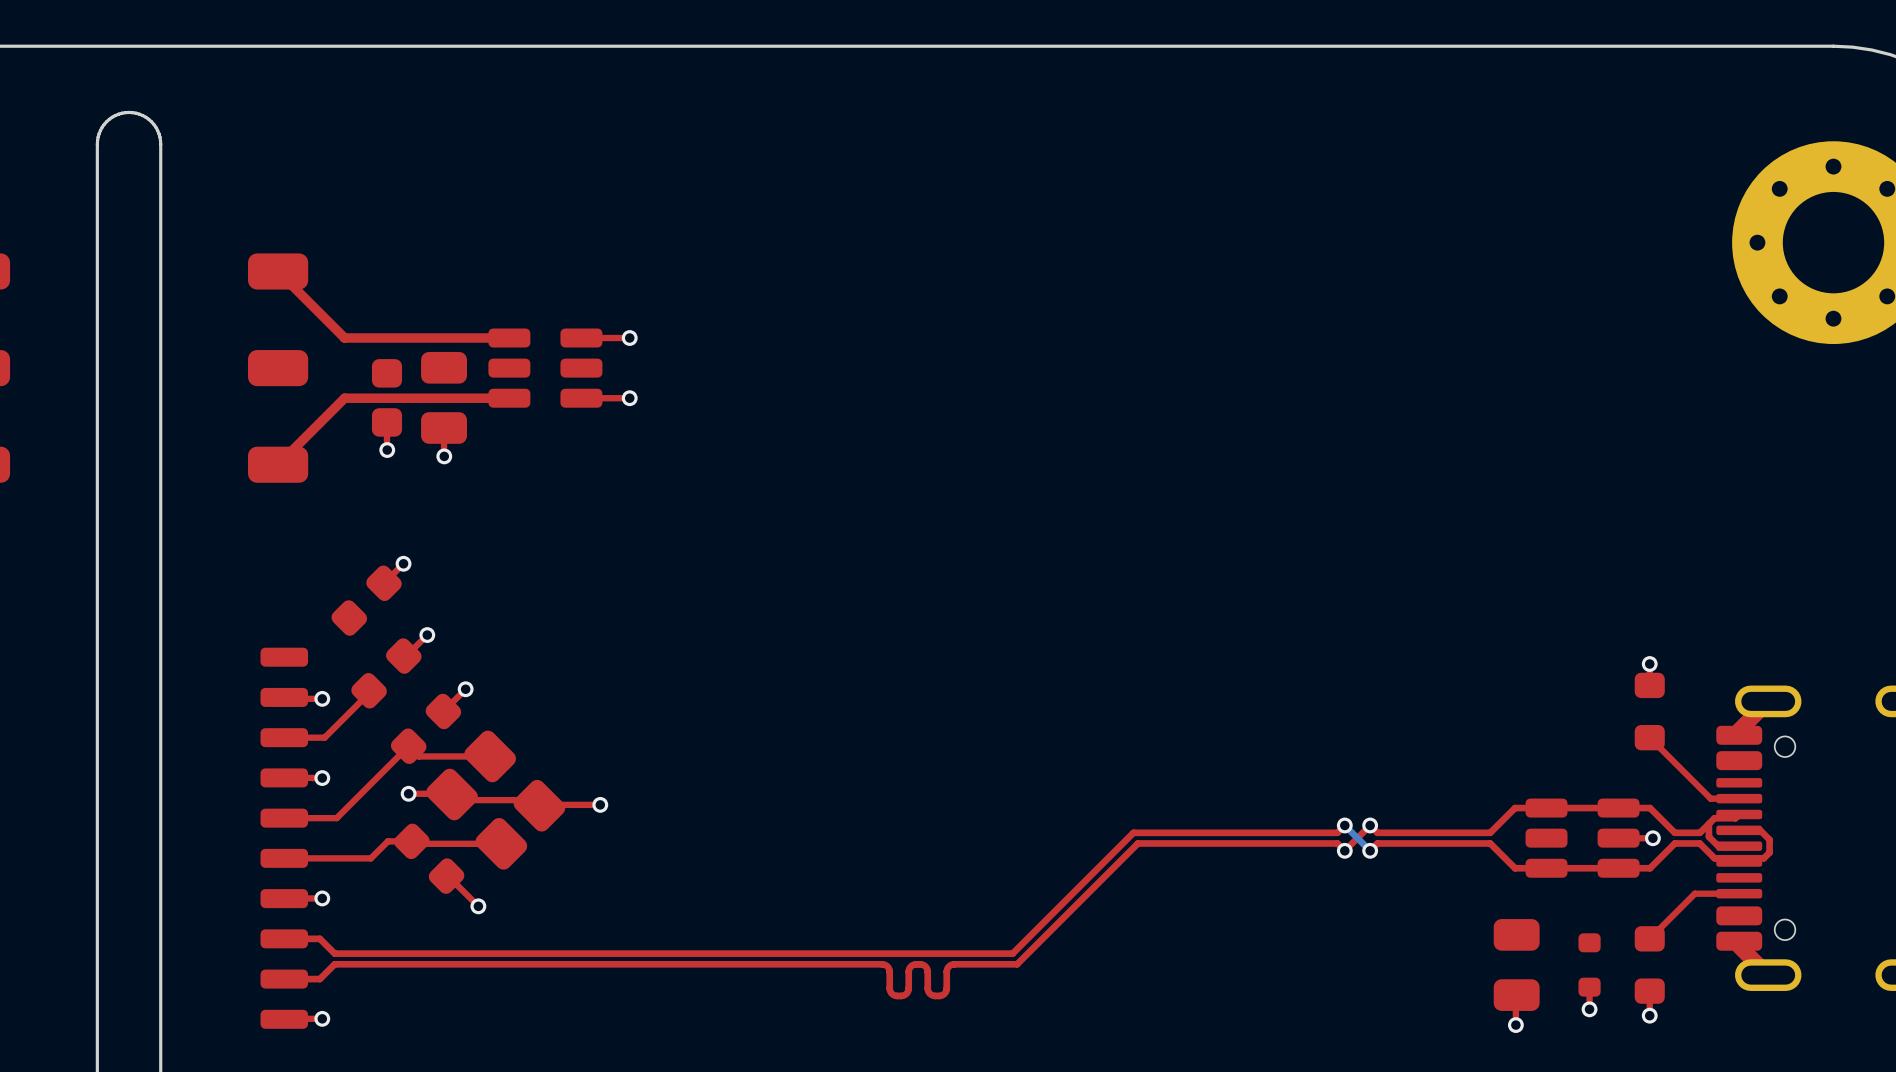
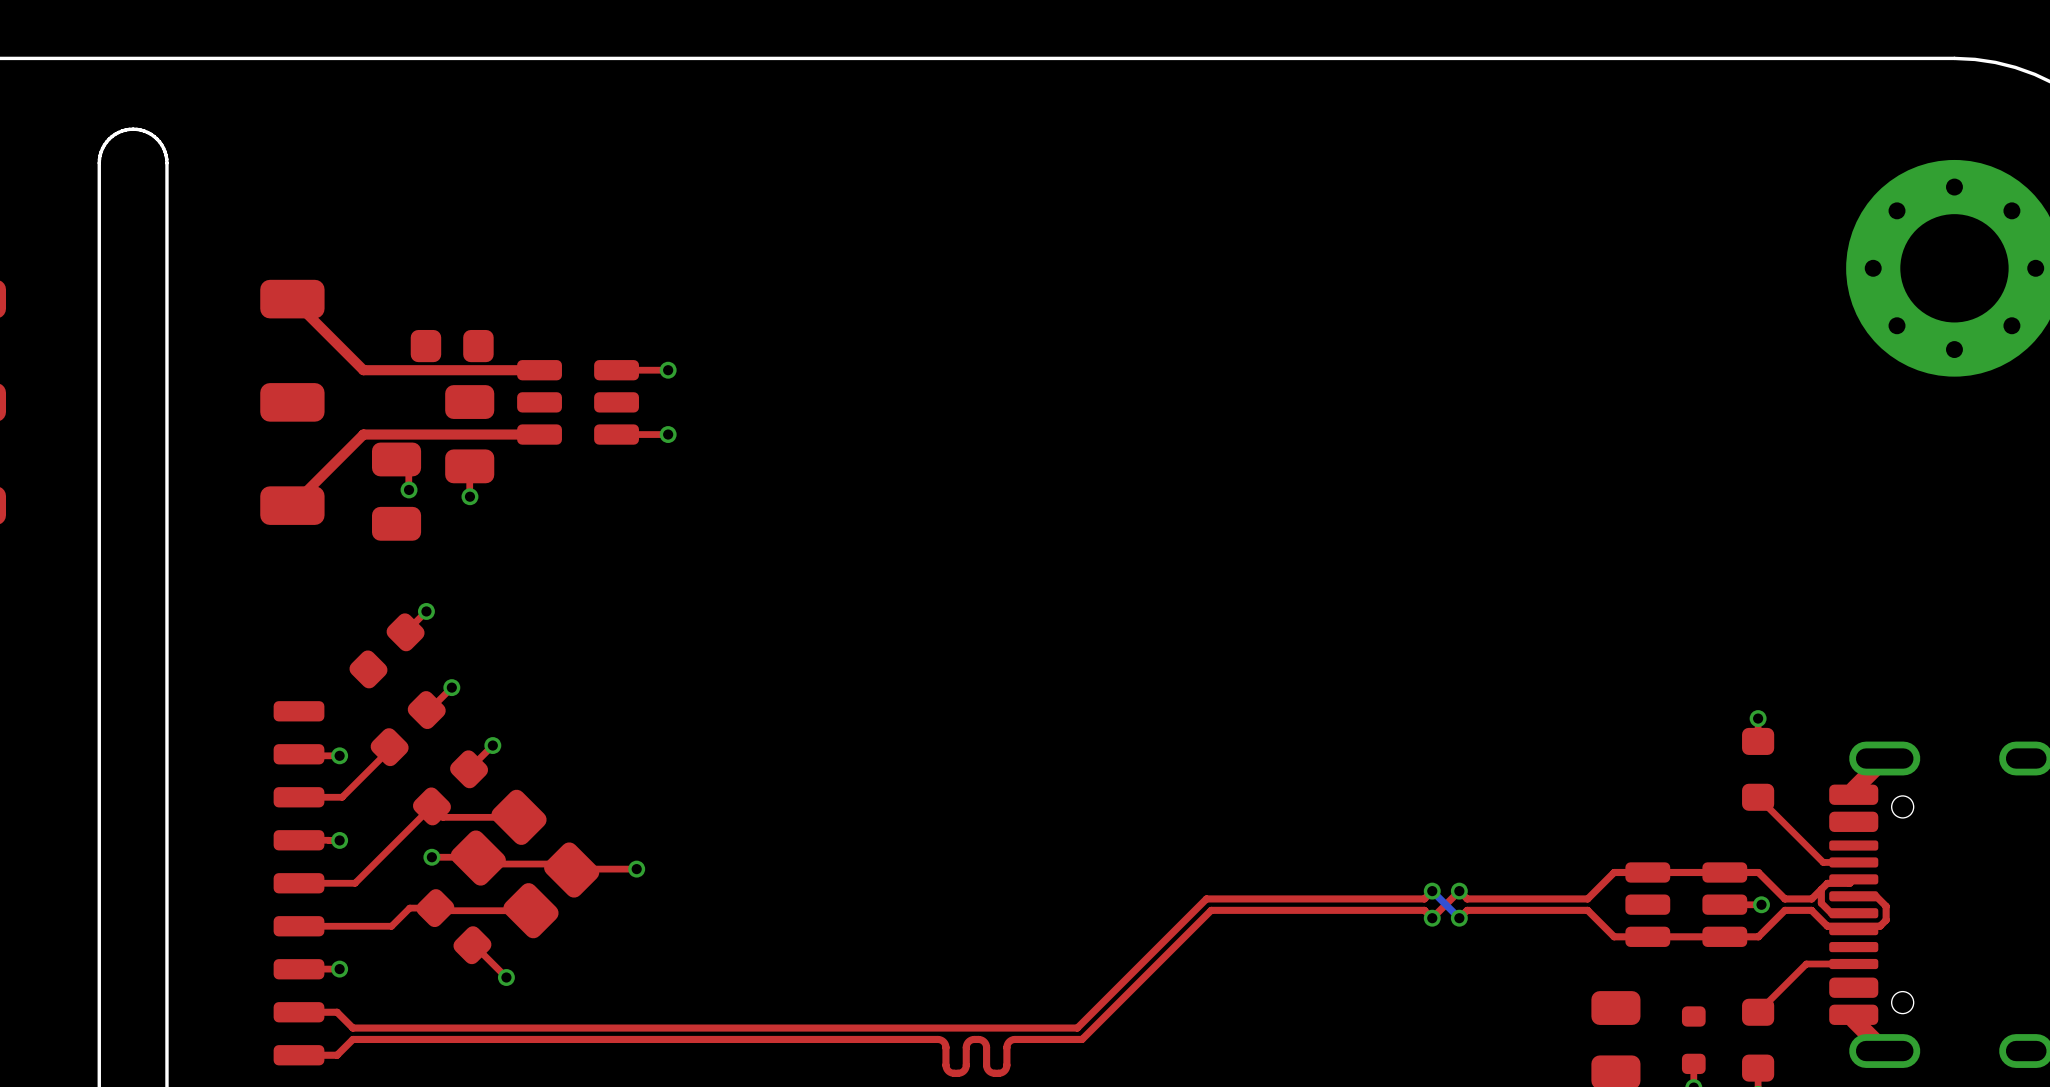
part rotation: 0° (387, 397) -> 90° clockwise (452, 346)
part position: (387, 397) -> (452, 346)
part: none -> (396, 491)

